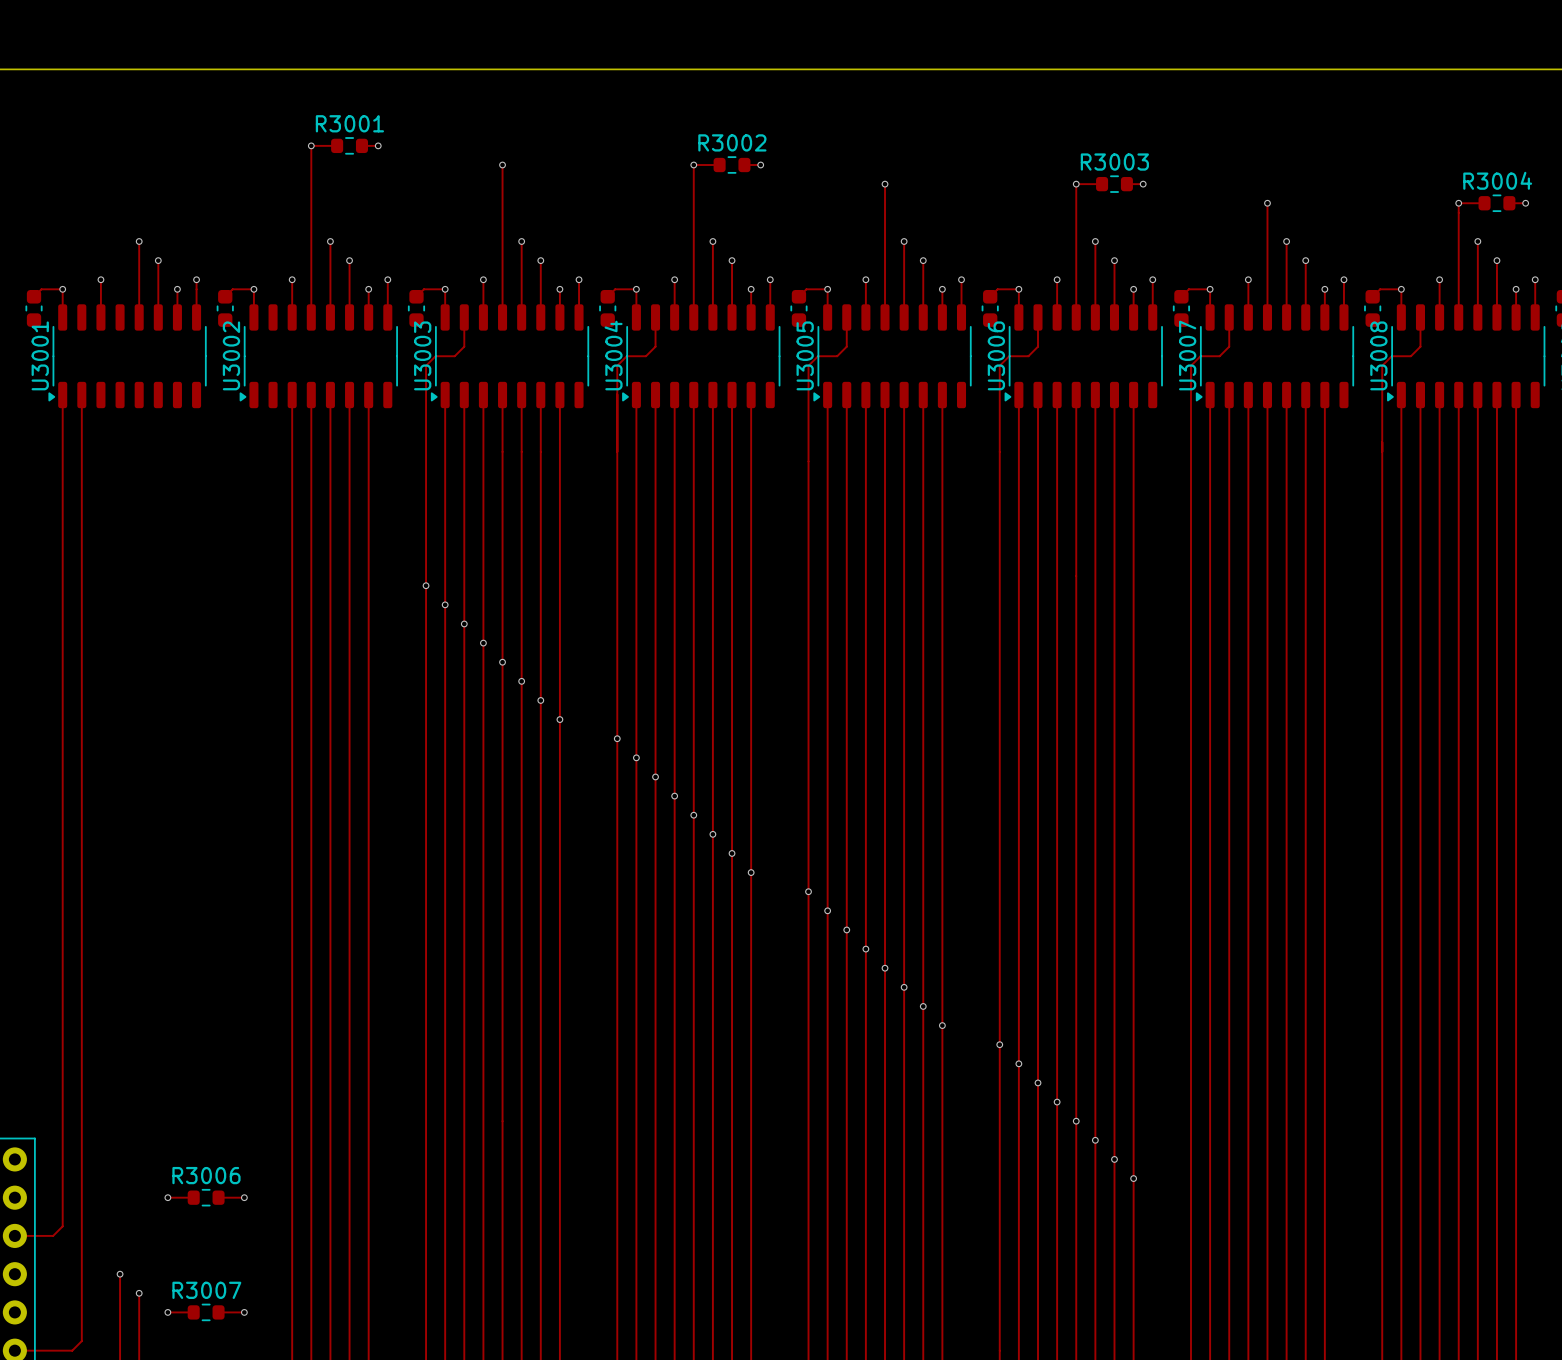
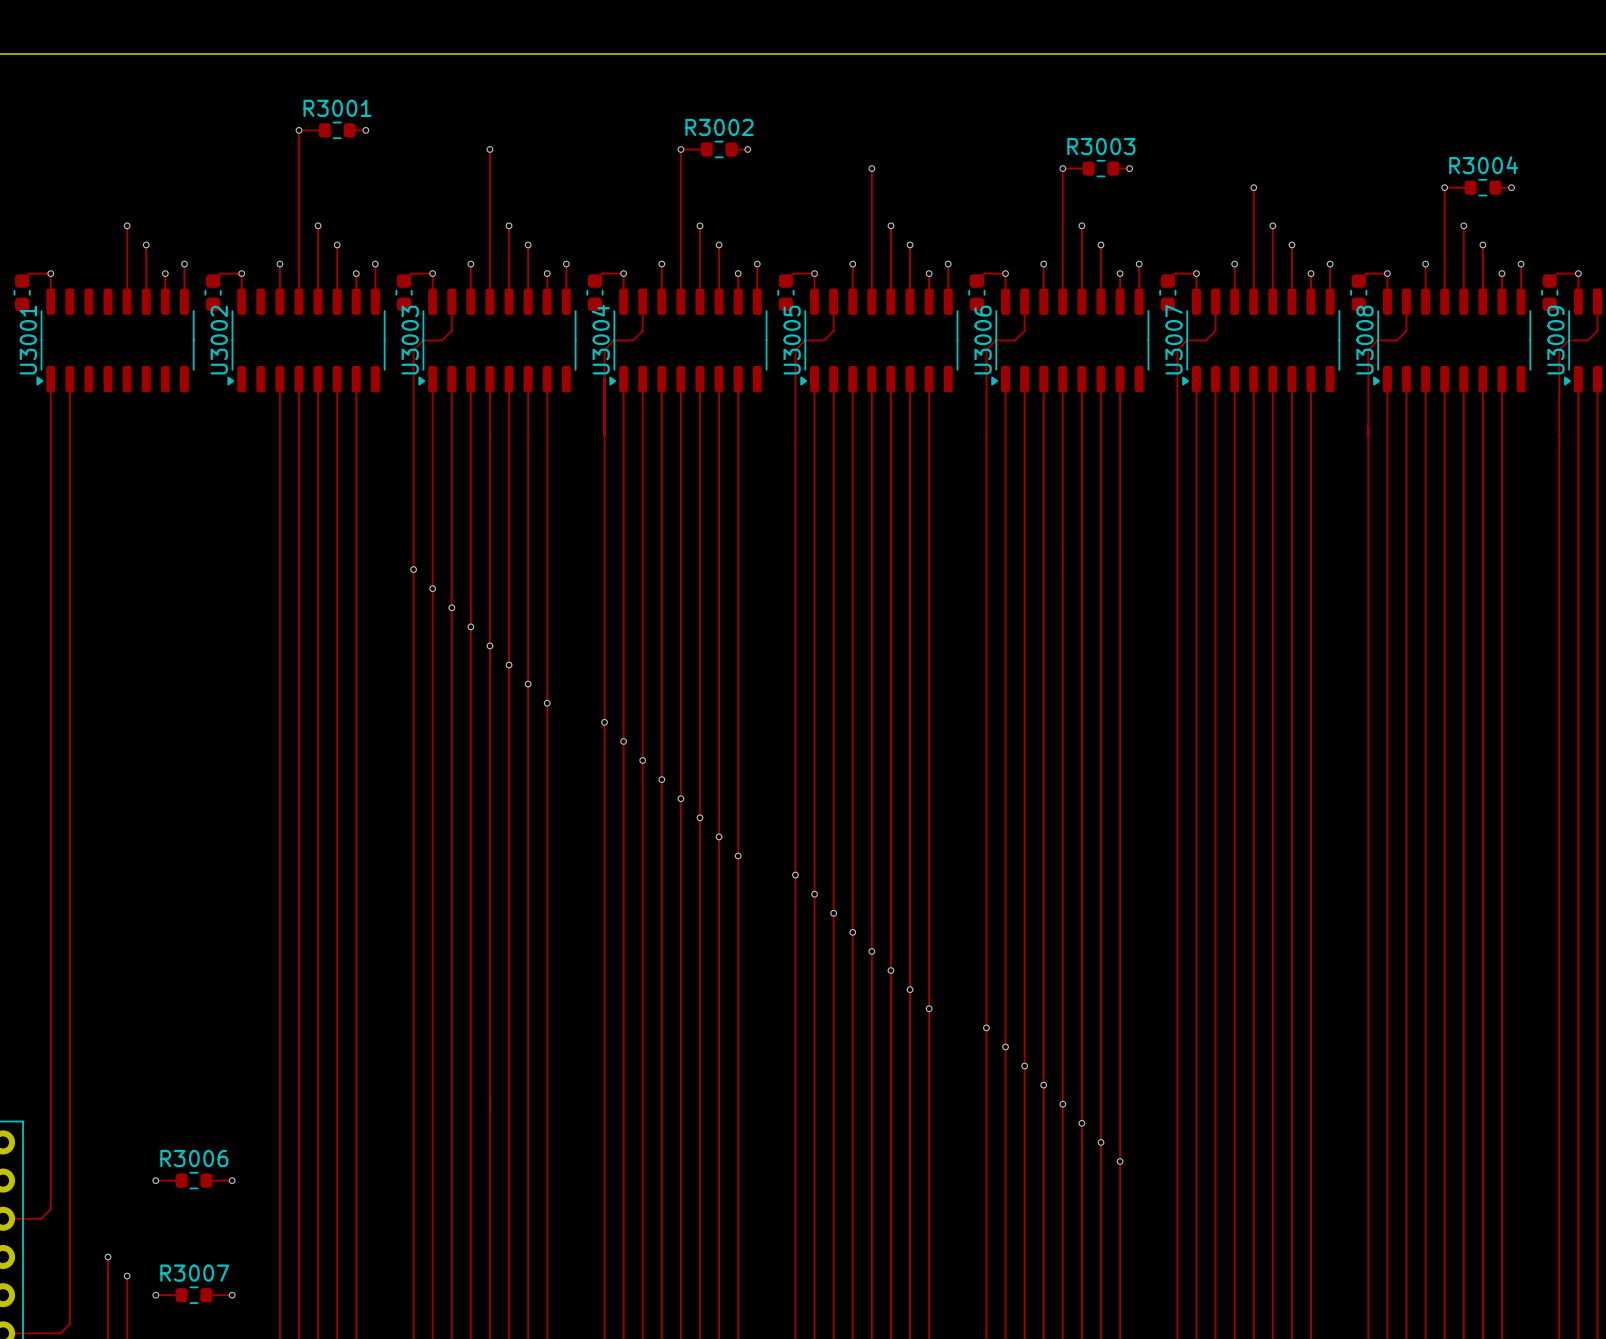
track: (100, 279) (100, 317) -> none
via: (100, 279) -> none

